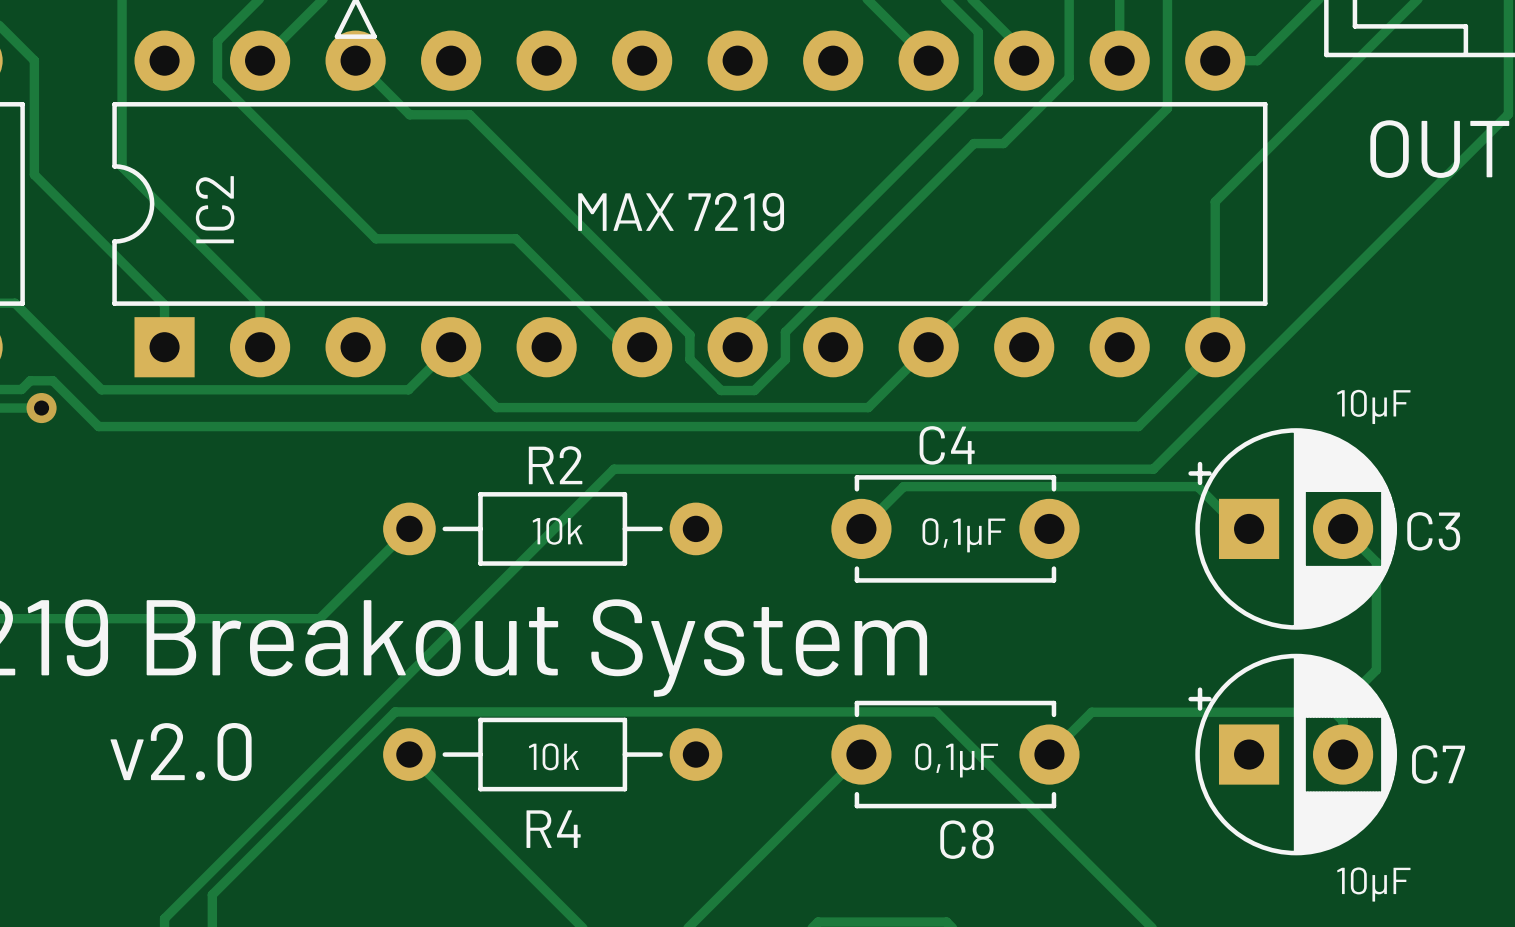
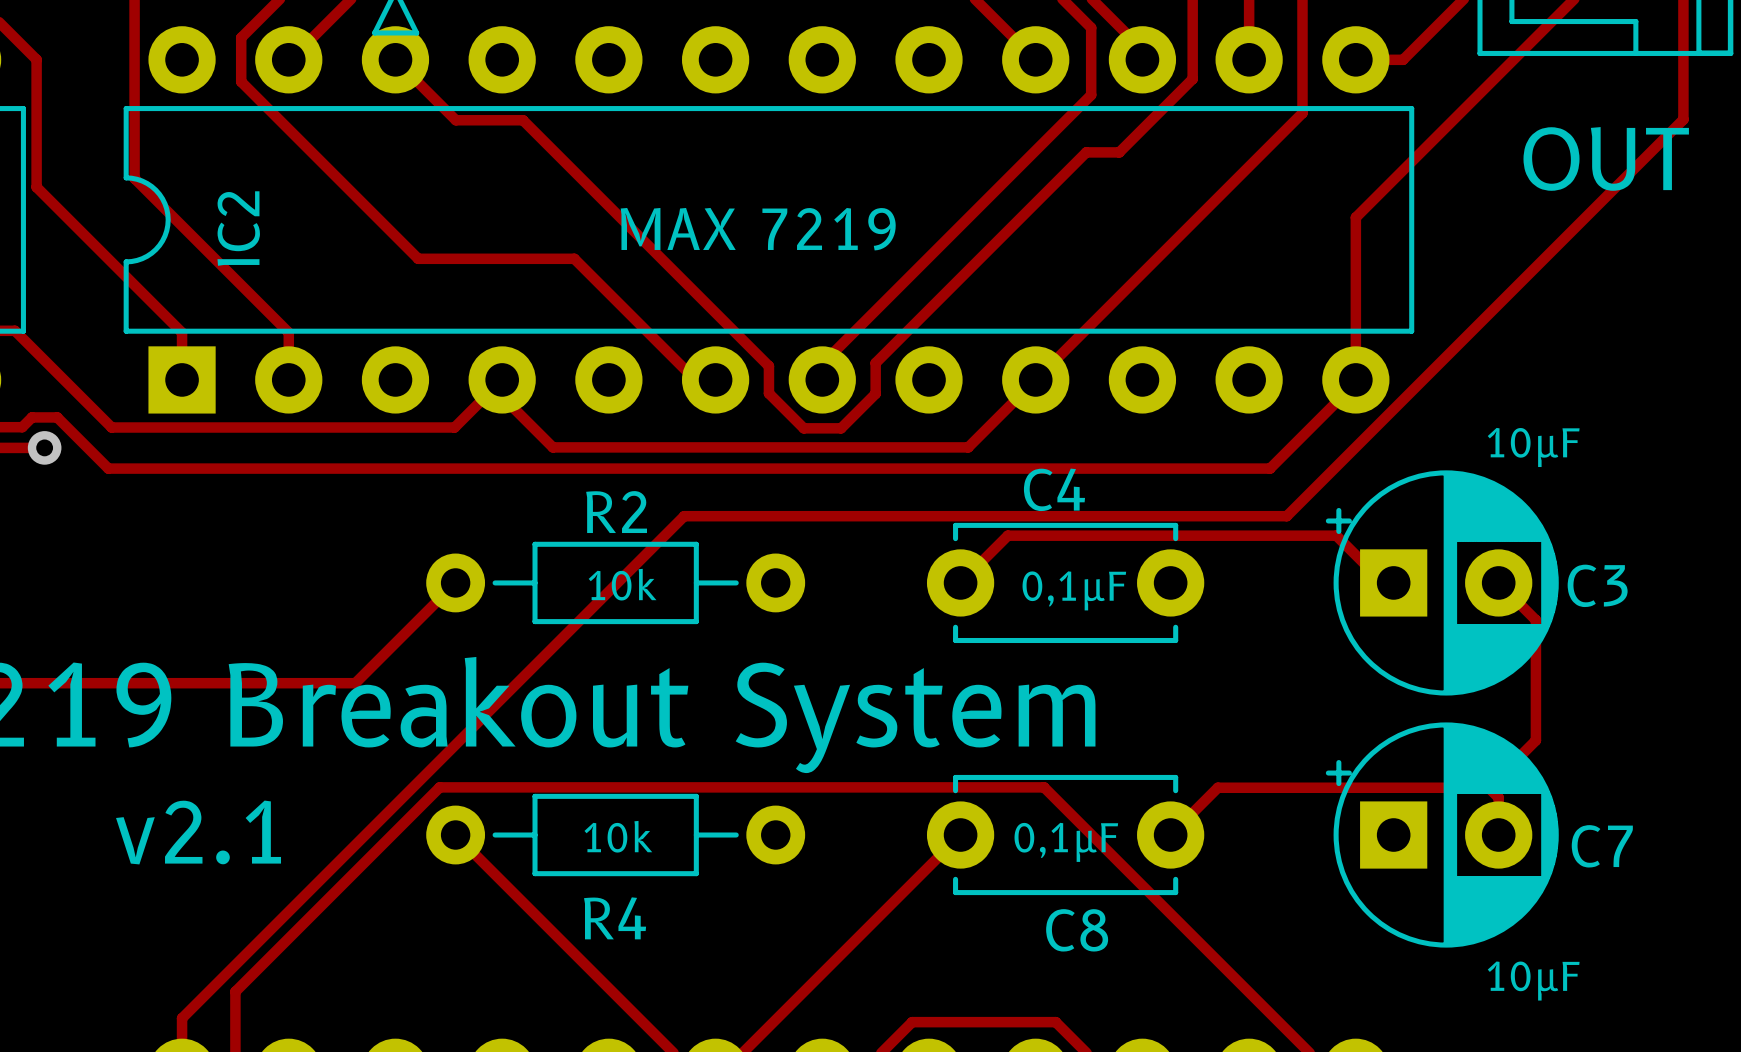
text: v2.0 (181, 751) -> v2.1 (198, 832)

